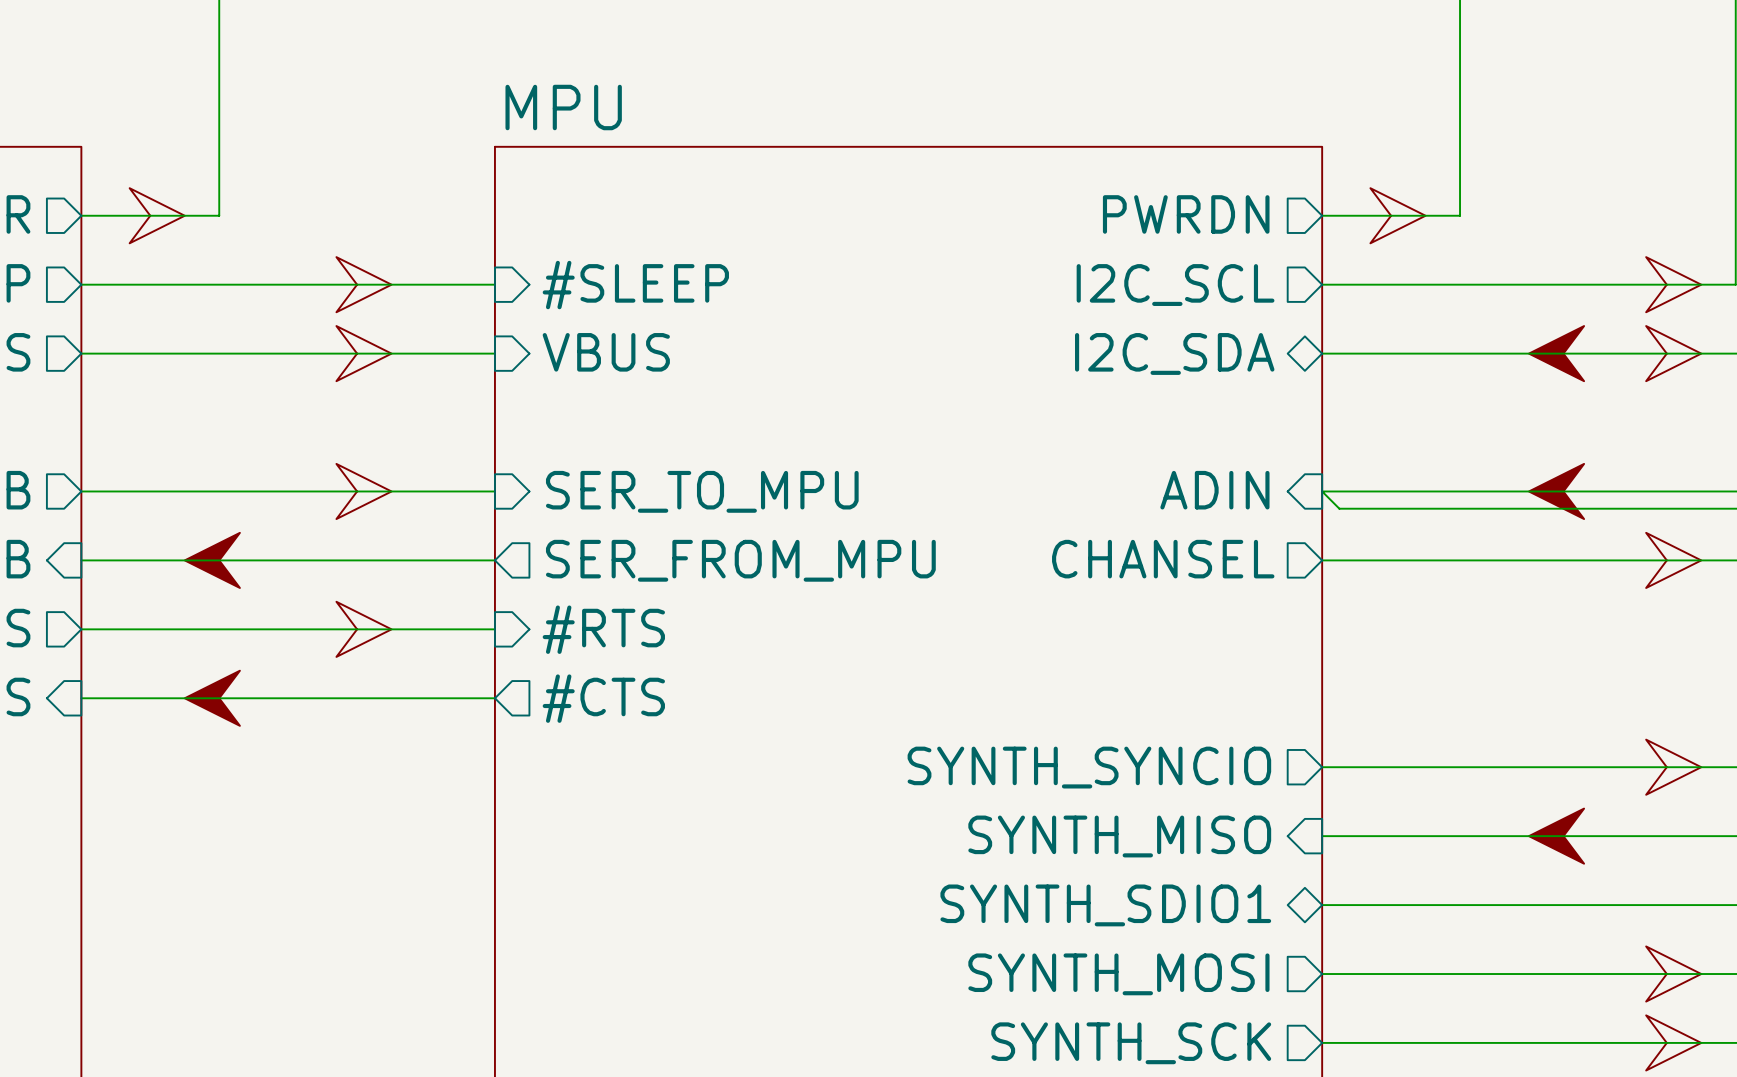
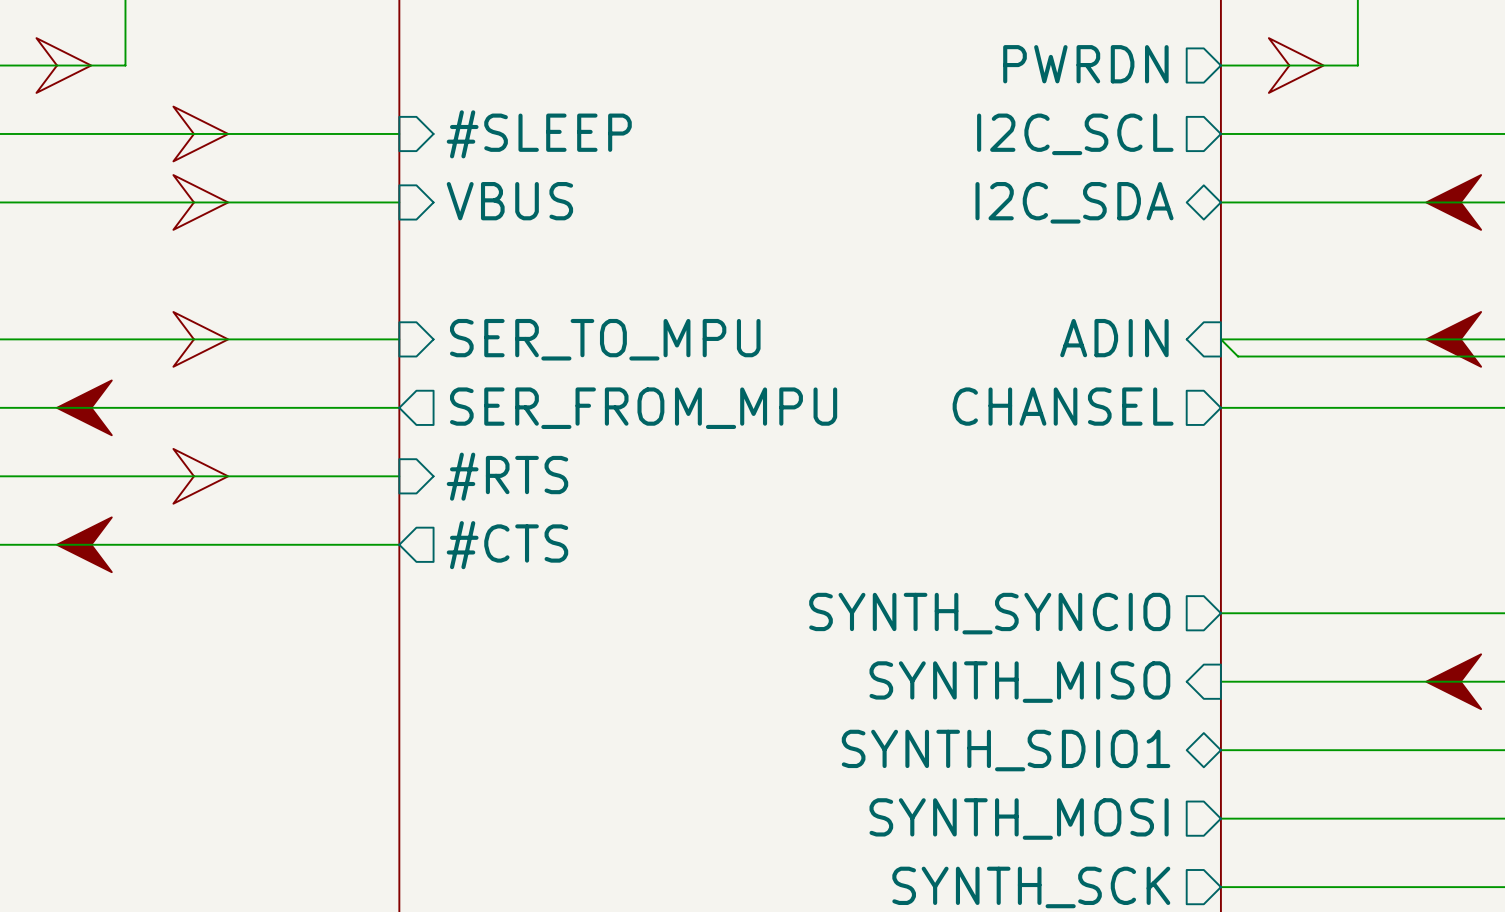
power symbol: none -> (200, 133)
power symbol: (363, 284) -> none
power symbol: none -> (200, 202)
power symbol: (363, 353) -> none
power symbol position: (363, 491) -> (200, 339)
power symbol position: (212, 560) -> (84, 407)
power symbol position: (363, 629) -> (200, 476)
power symbol position: (212, 698) -> (84, 544)

